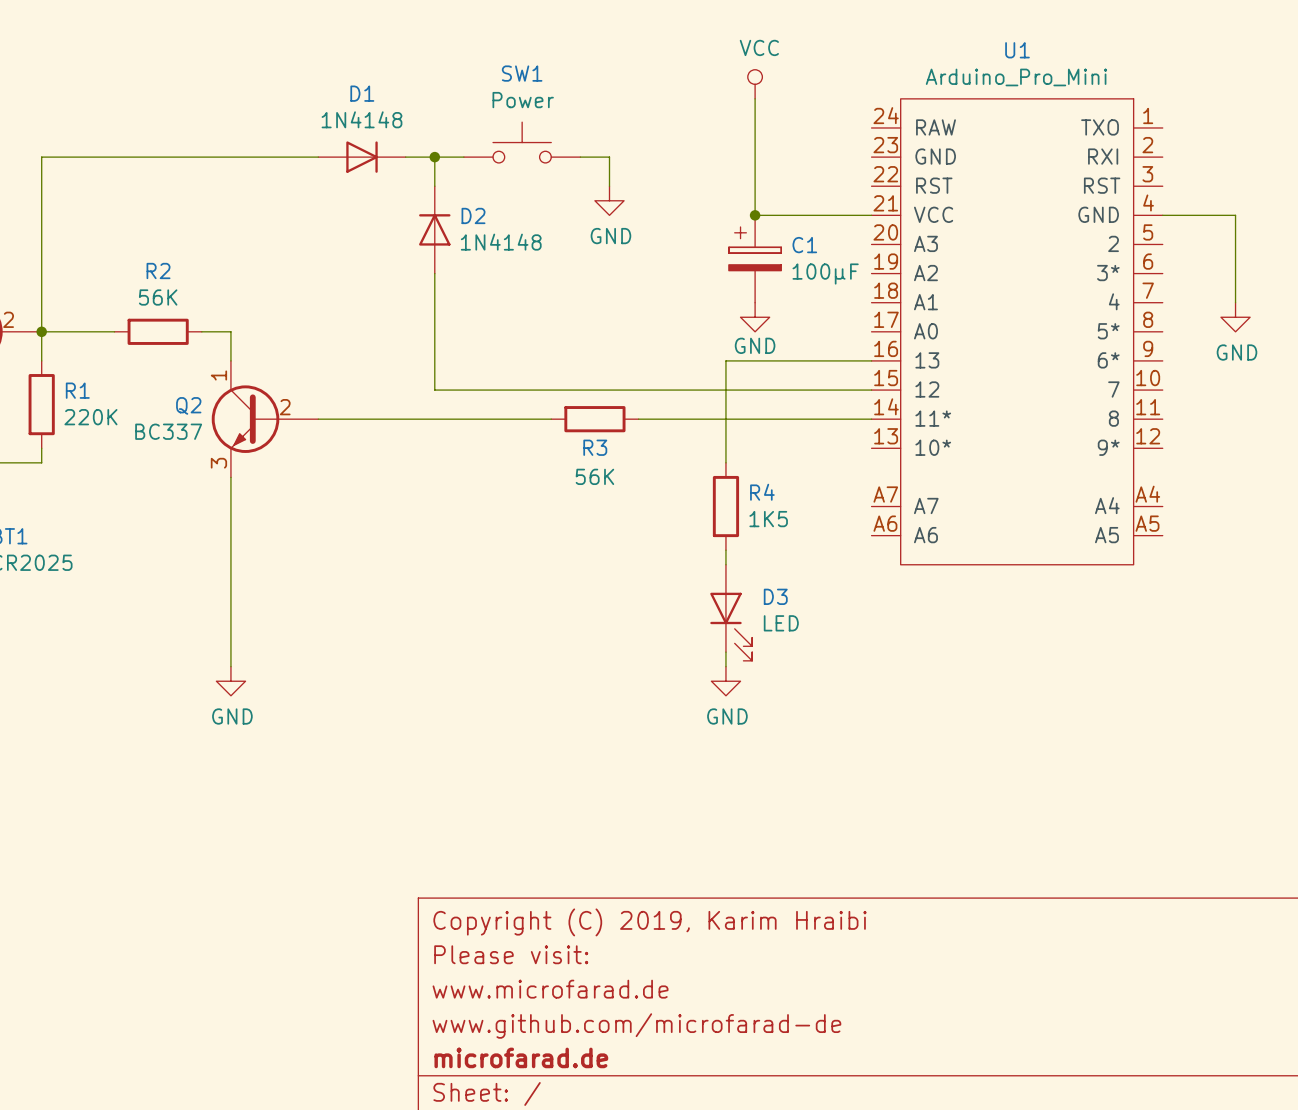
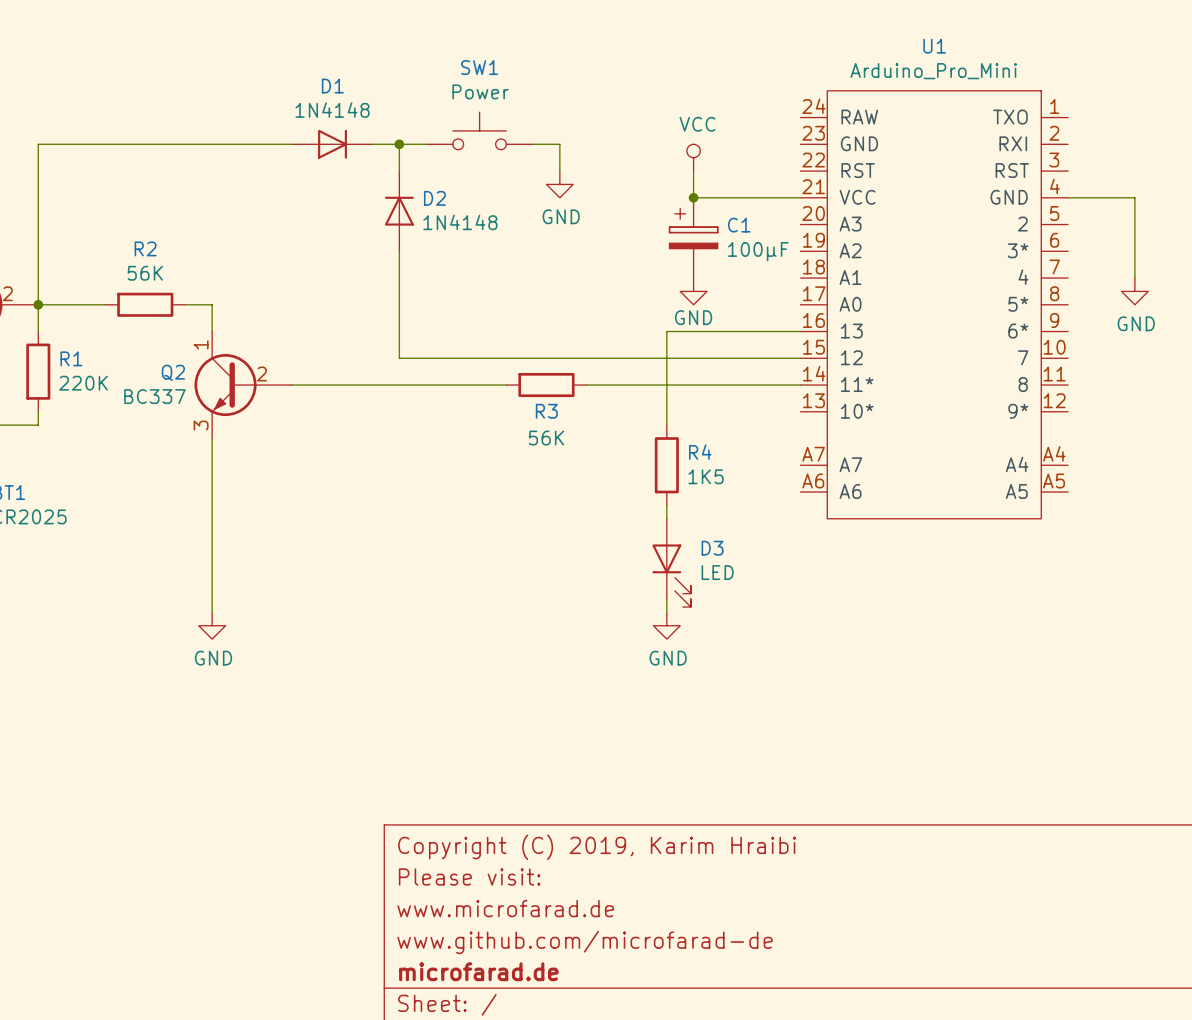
power symbol position: VCC (755, 84) -> VCC (693, 157)
wire: (755, 98) (755, 186) -> none

